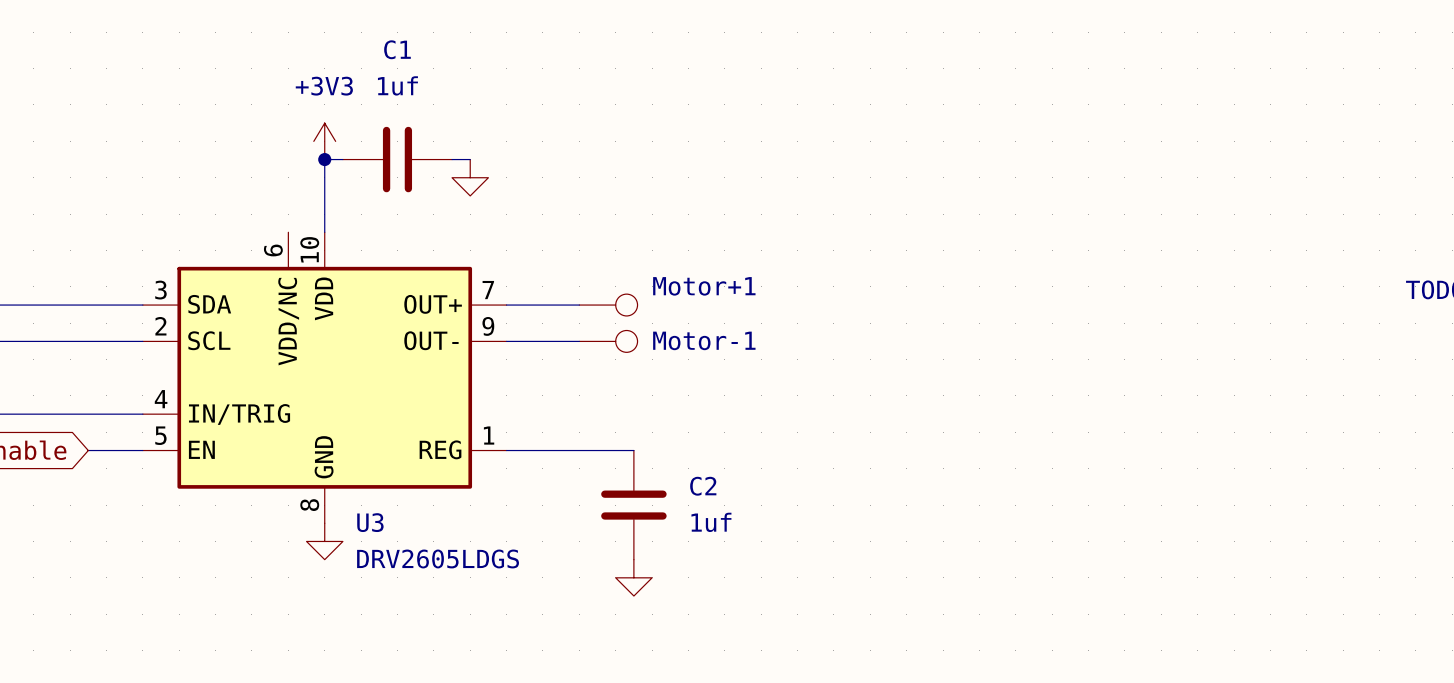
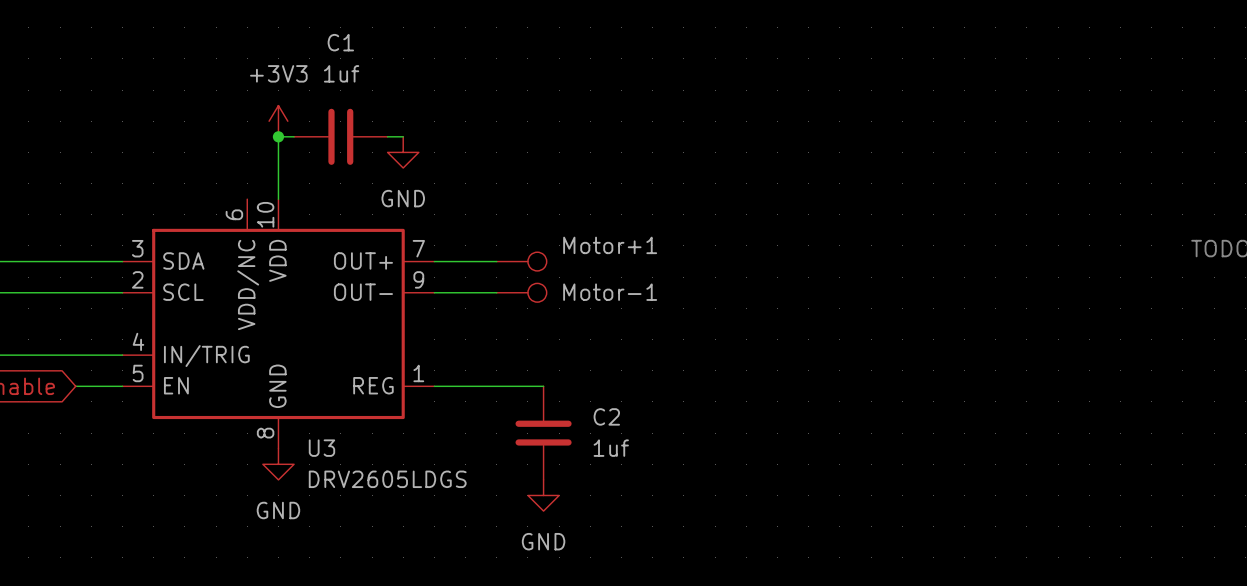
power symbol text: none -> GND (403, 198)
power symbol text: none -> GND (278, 510)
power symbol text: none -> GND (543, 541)

